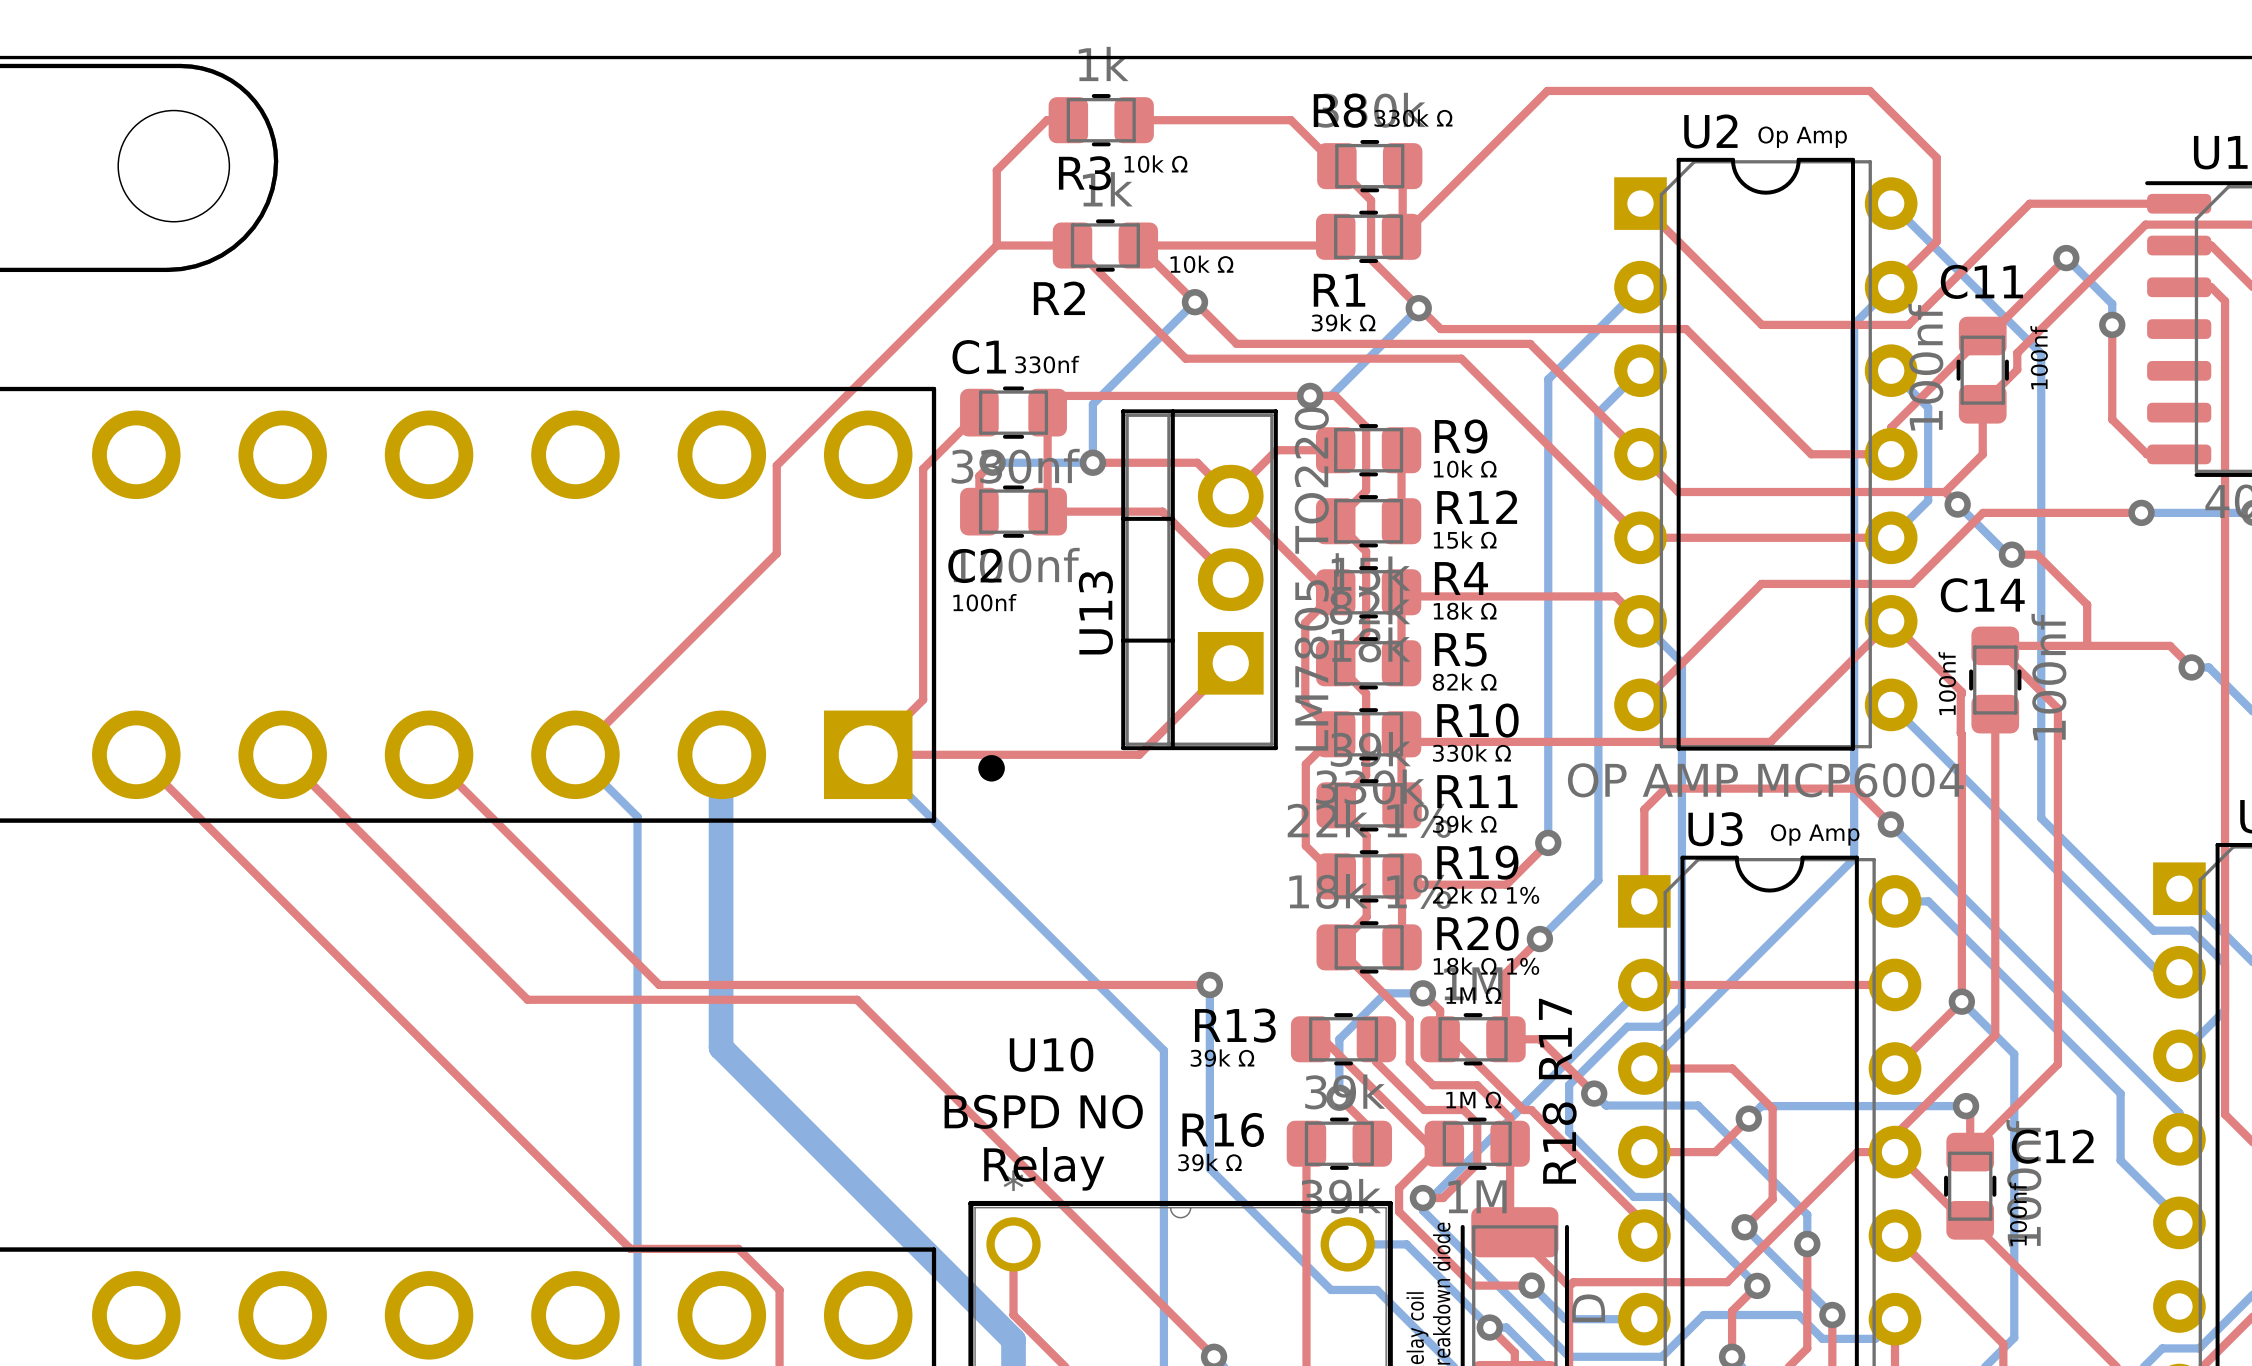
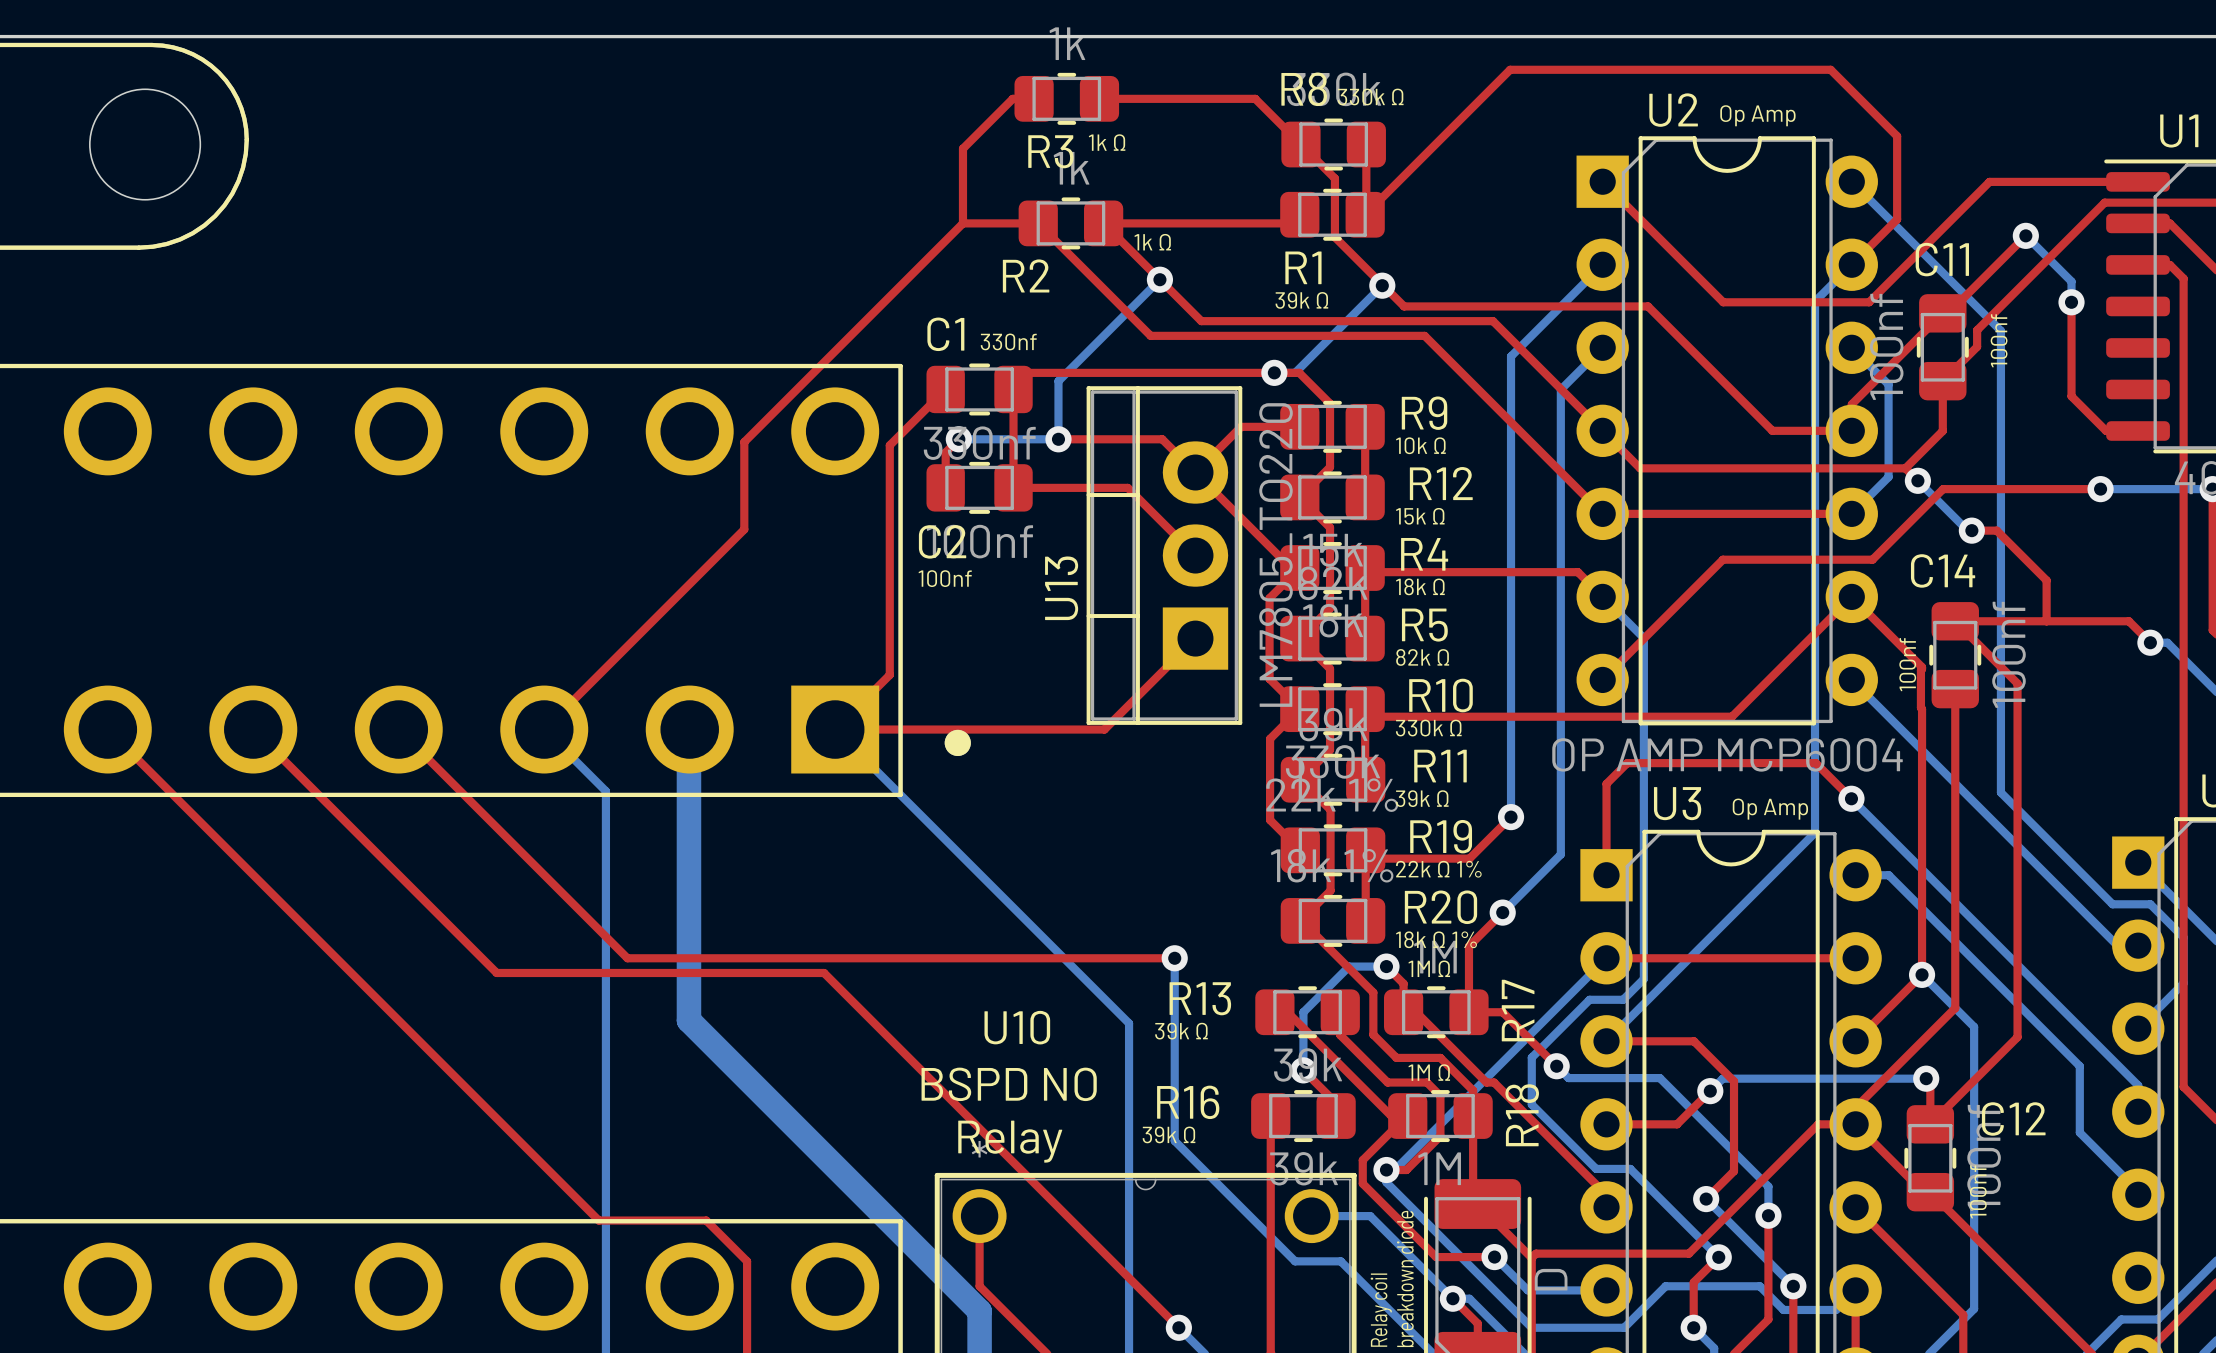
text: 10k Ω (1156, 164) -> 1k Ω (1107, 142)
text: 10k Ω (1201, 264) -> 1k Ω (1152, 242)

